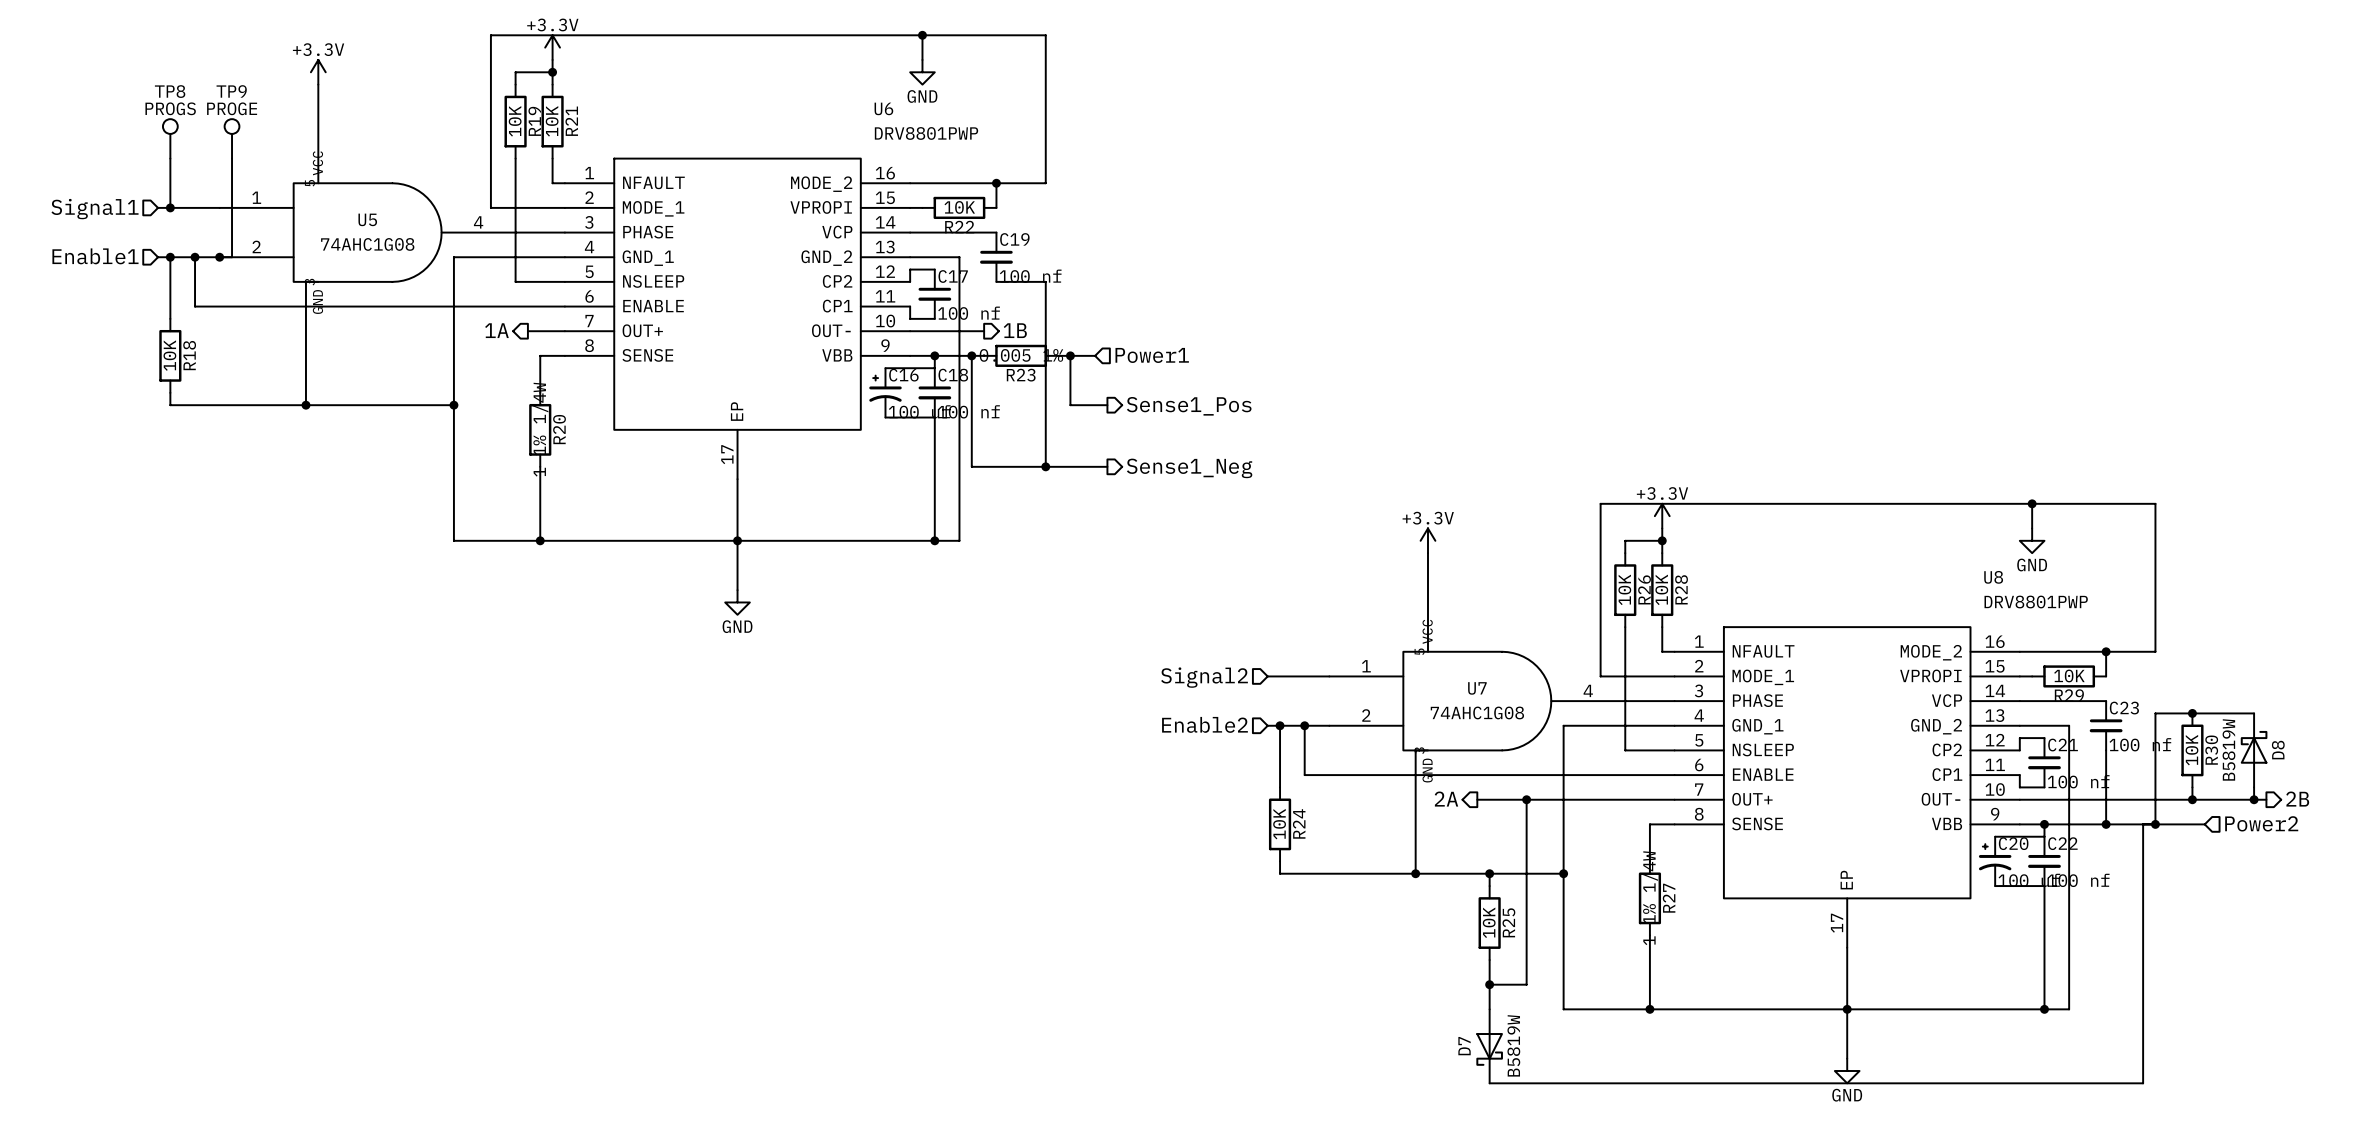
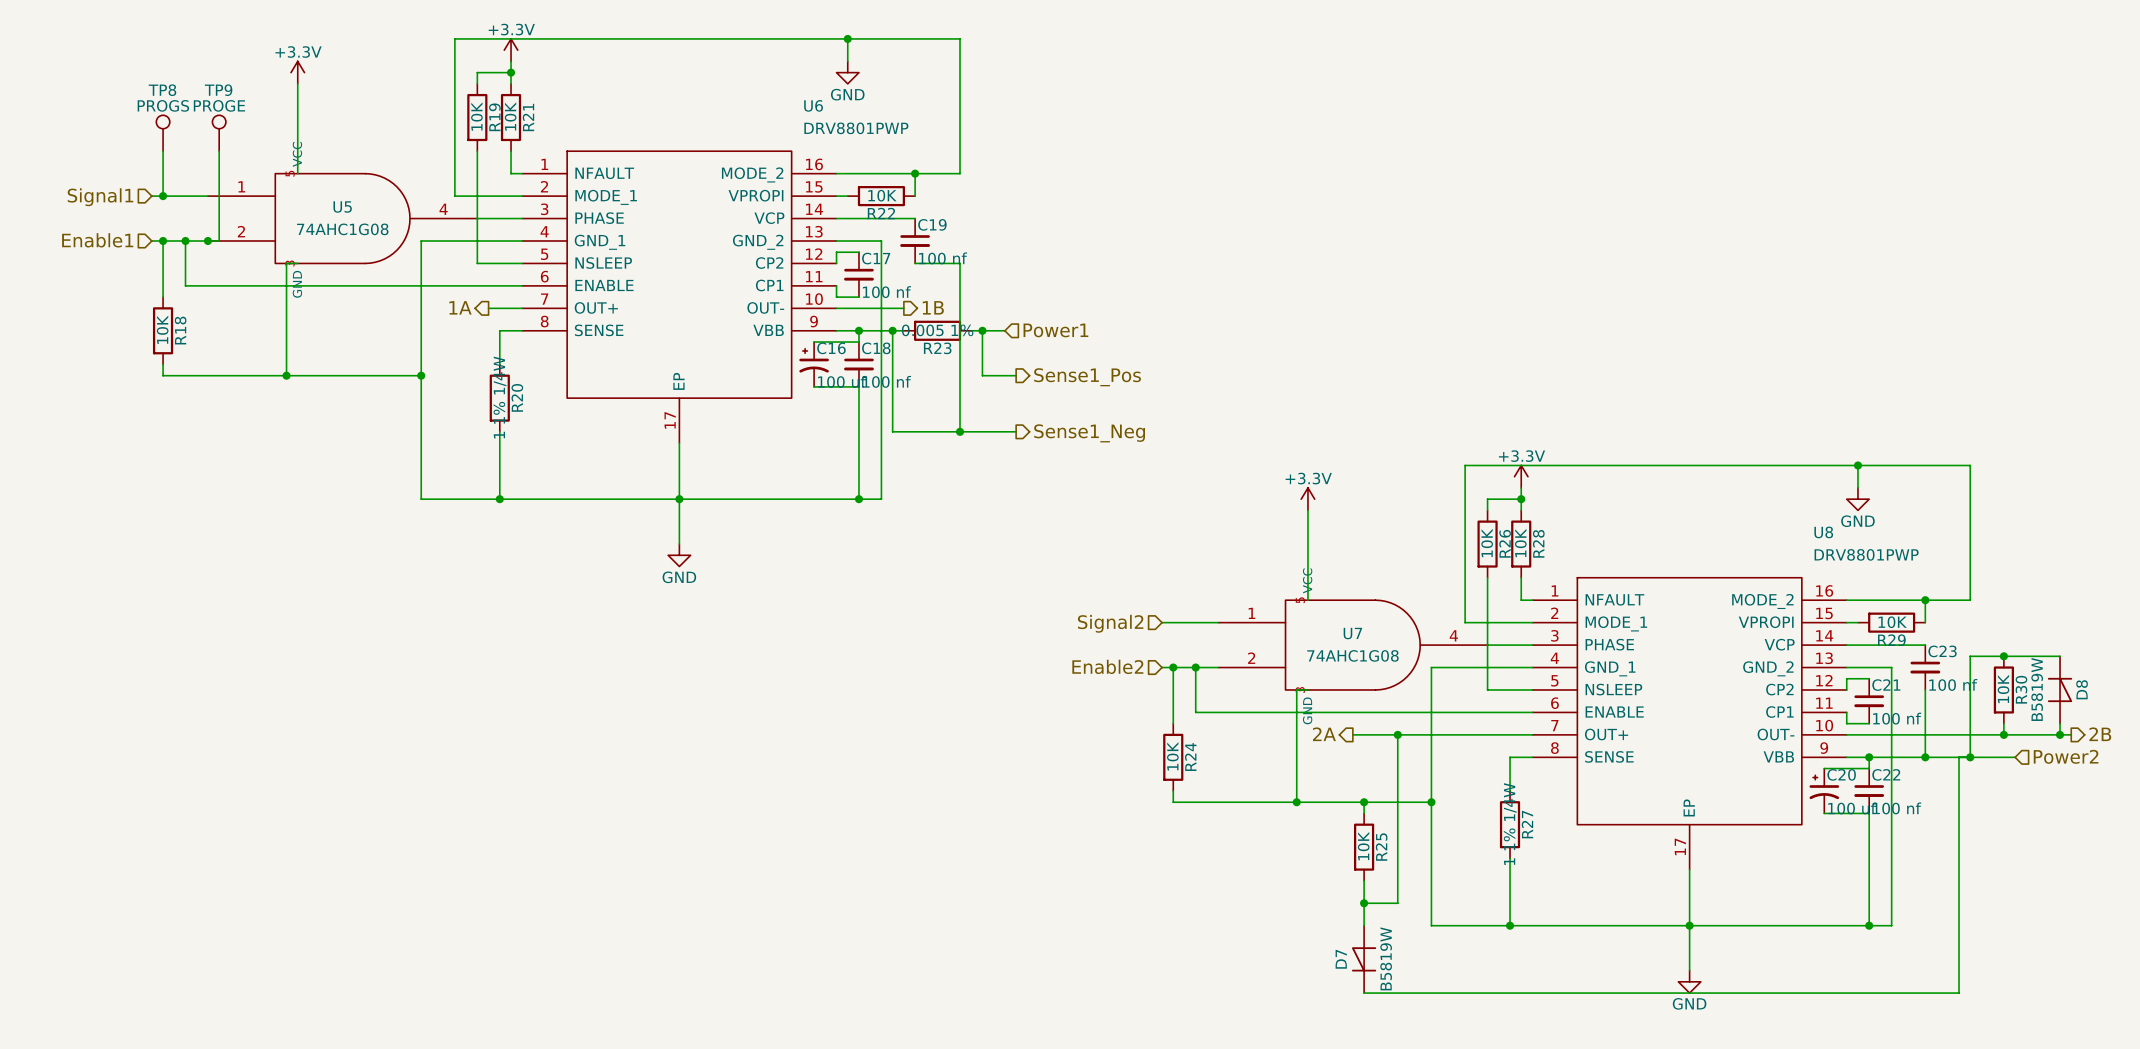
D8 symbol: [2240, 713, 2268, 788] -> [2047, 656, 2073, 724]
D7 symbol: [1476, 1009, 1503, 1084] -> [1351, 925, 1377, 994]

